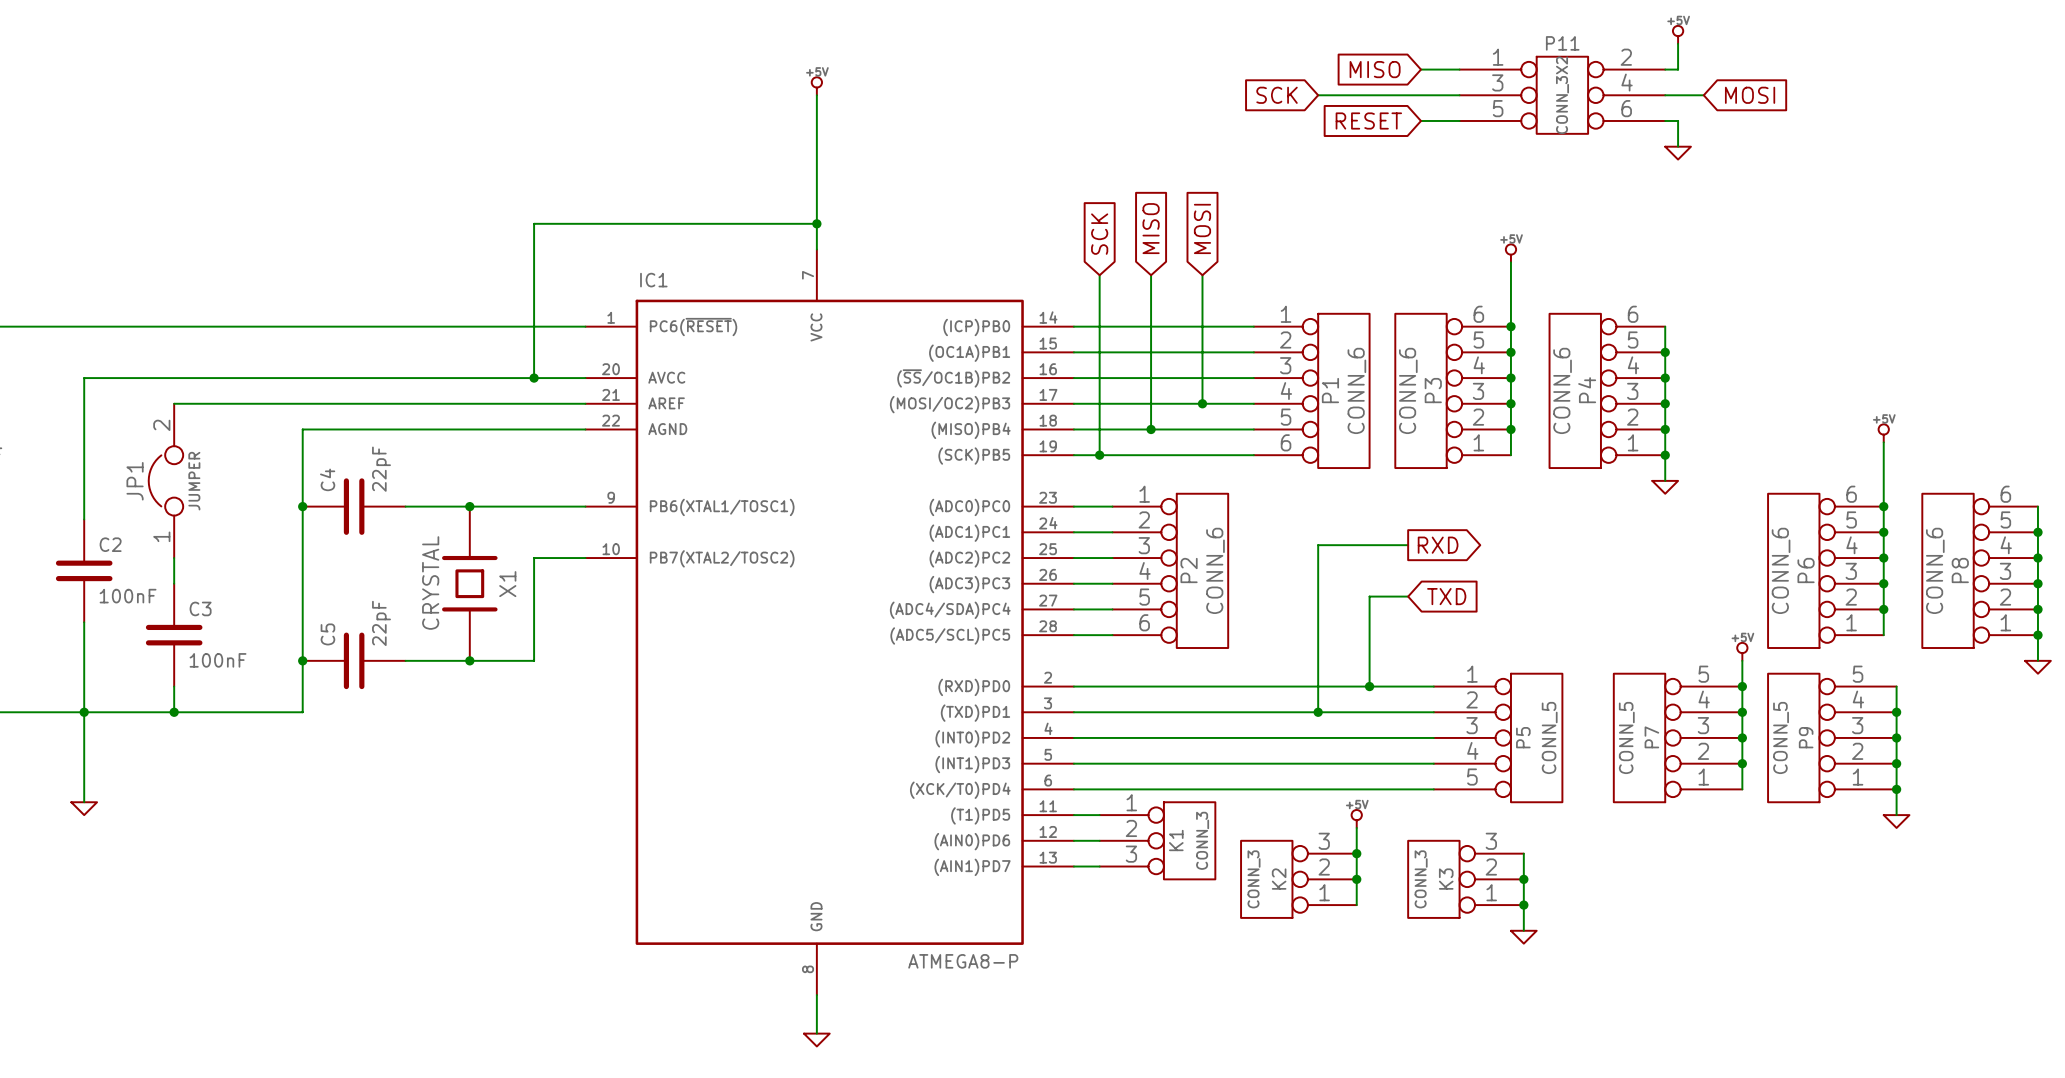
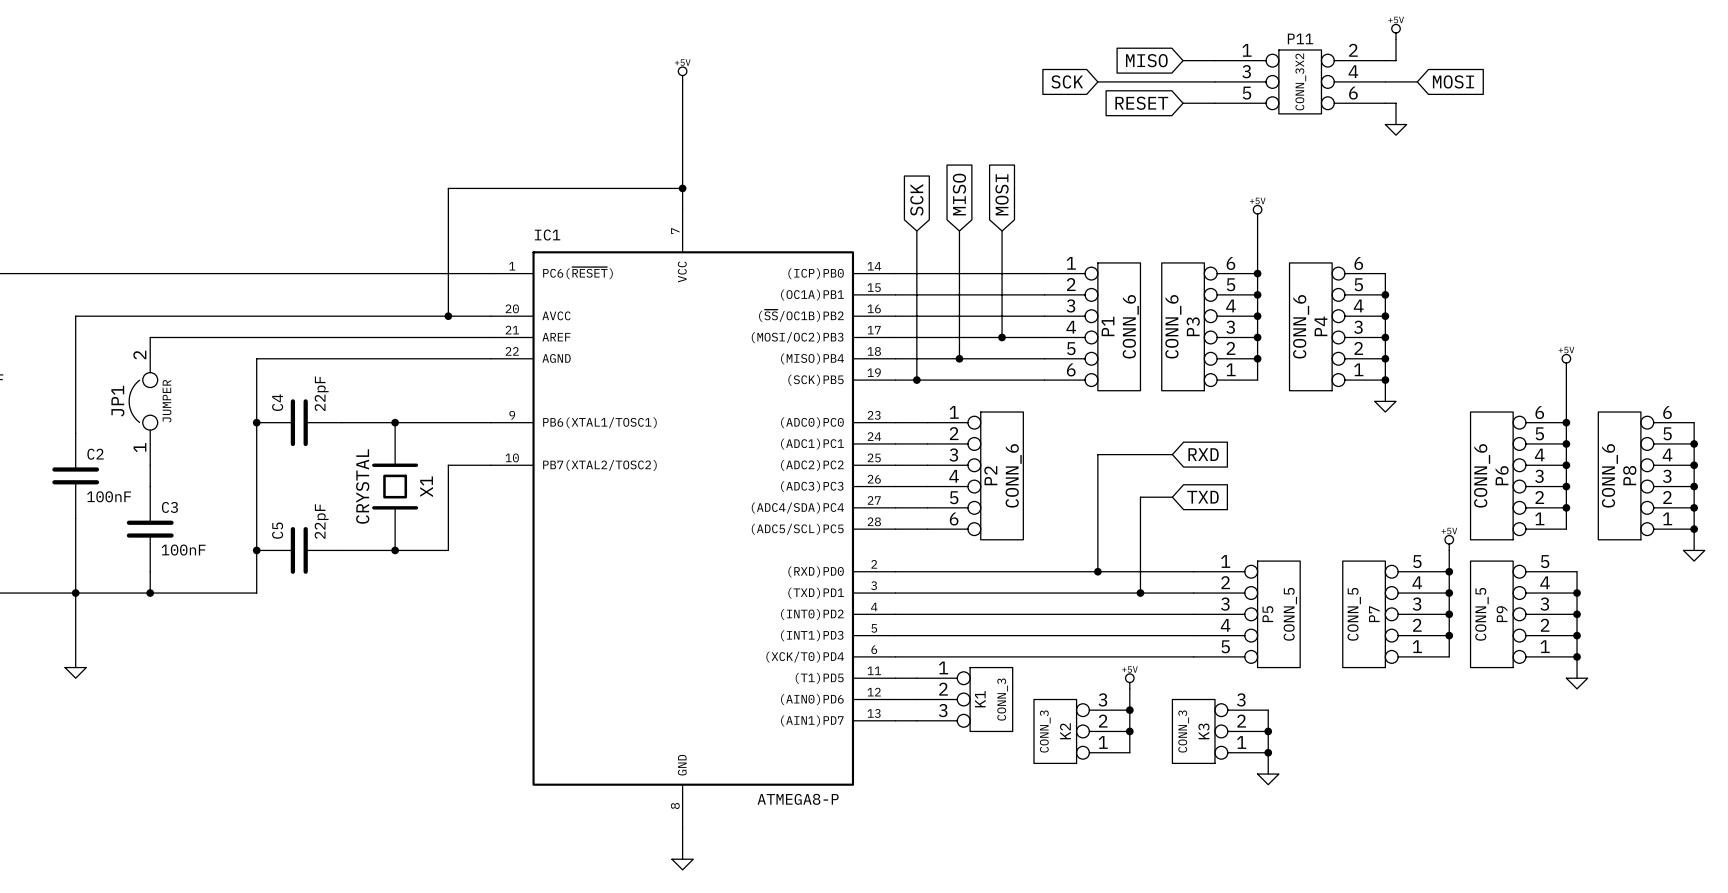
global label shape: output (1438, 545) -> input (1203, 454)
wire: (1318, 686) (1318, 712) -> (1140, 571) (1140, 593)
junction: none -> (1097, 571)
junction: (1369, 686) -> none
junction: (1318, 712) -> none
junction: none -> (1140, 593)

